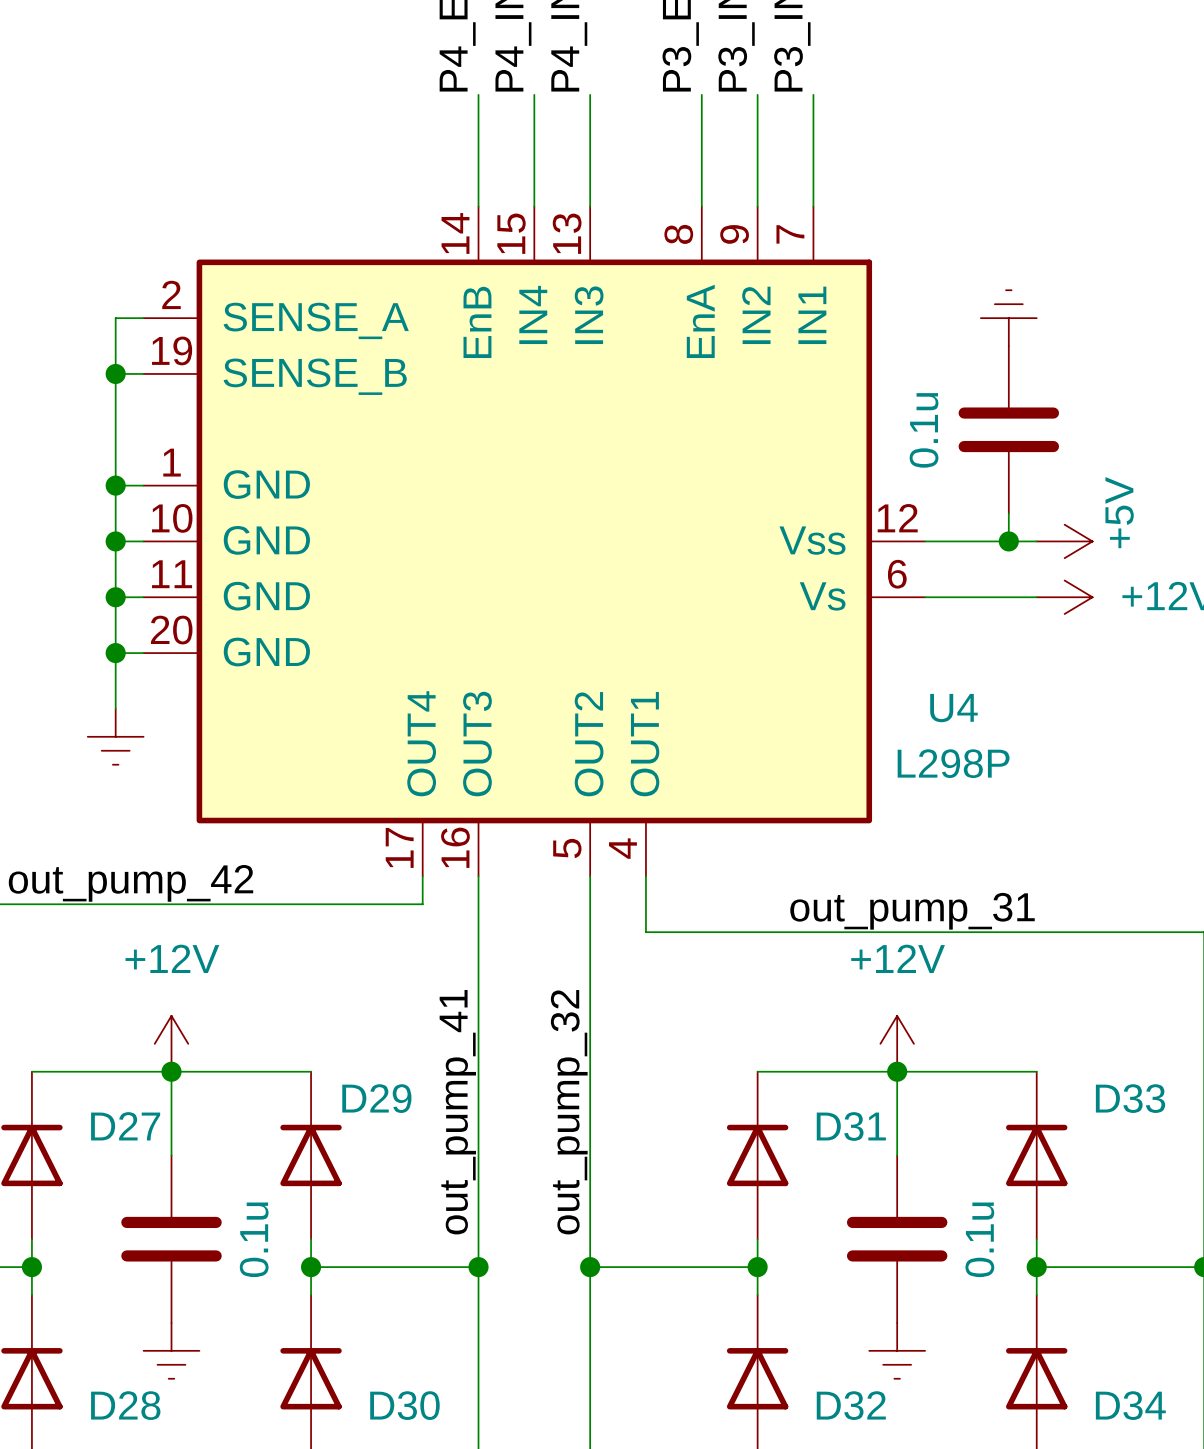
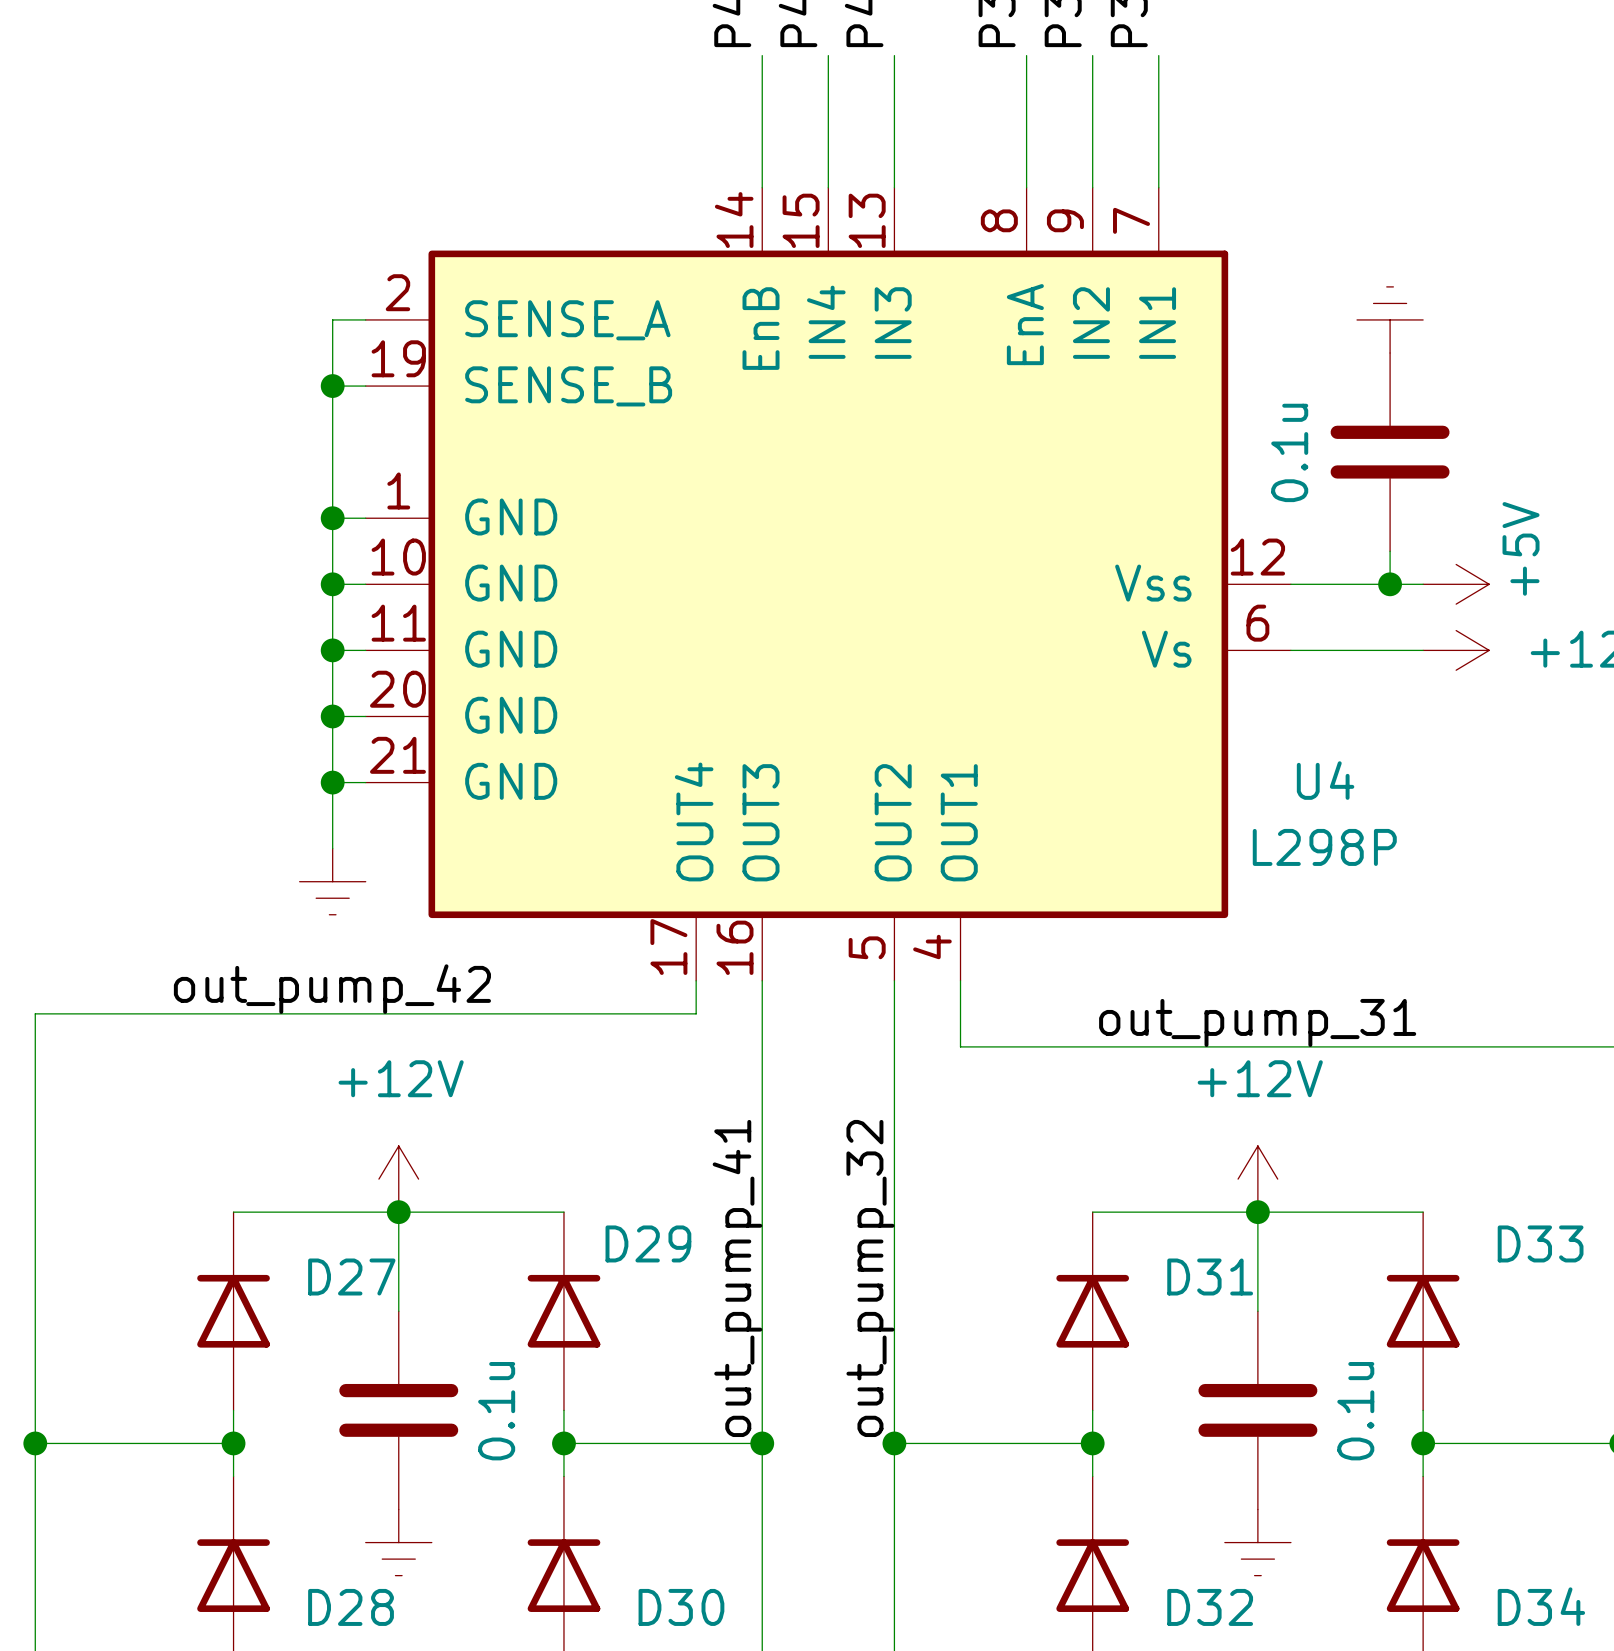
U4 symbol: [143, 206, 926, 877] -> [365, 187, 1291, 981]
junction: none -> (332, 782)
wire: none -> (365, 782) (332, 782) (332, 848)
power symbol position: (115, 736) -> (332, 881)

